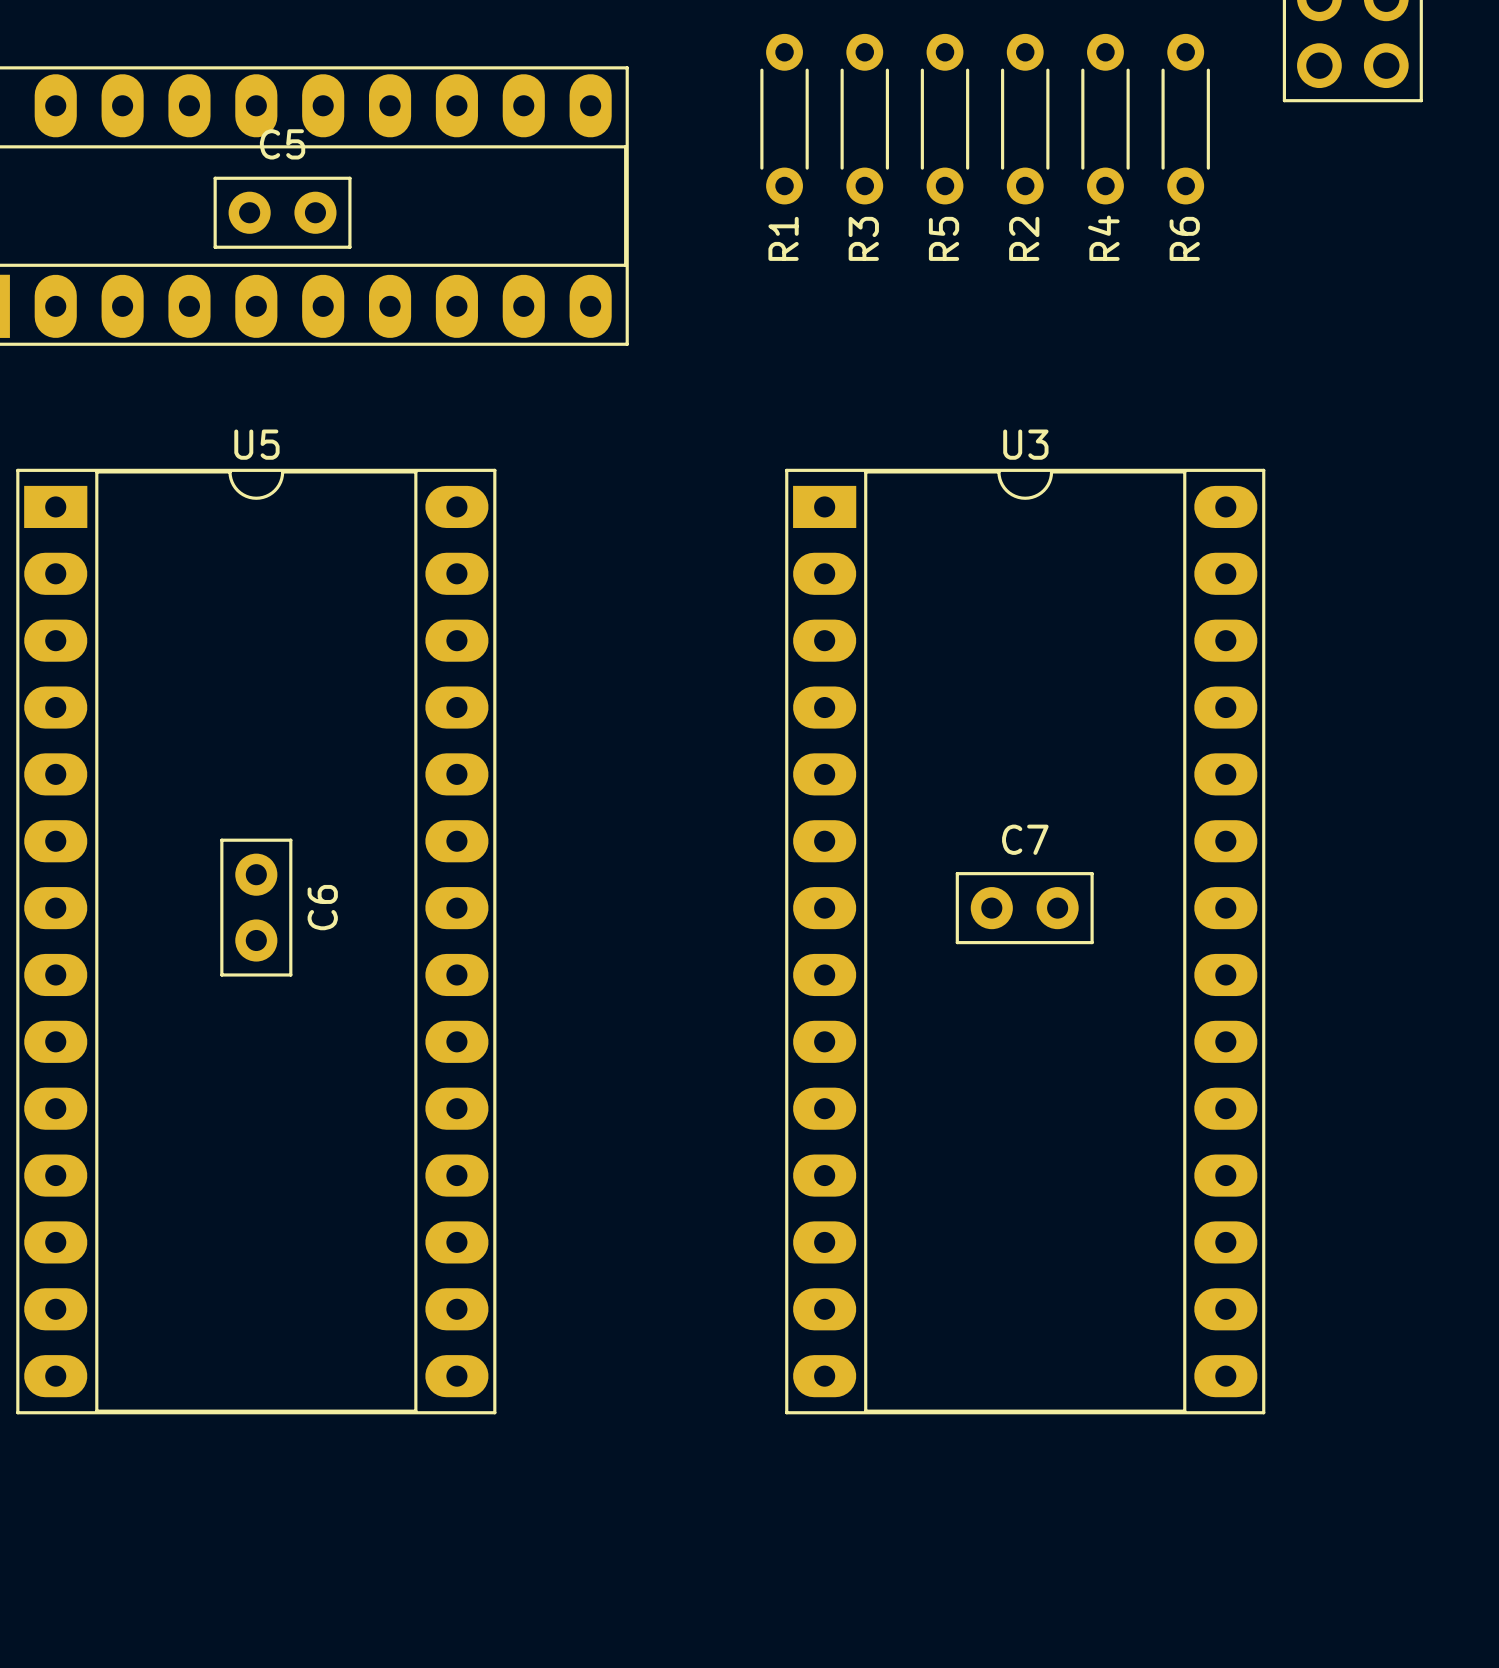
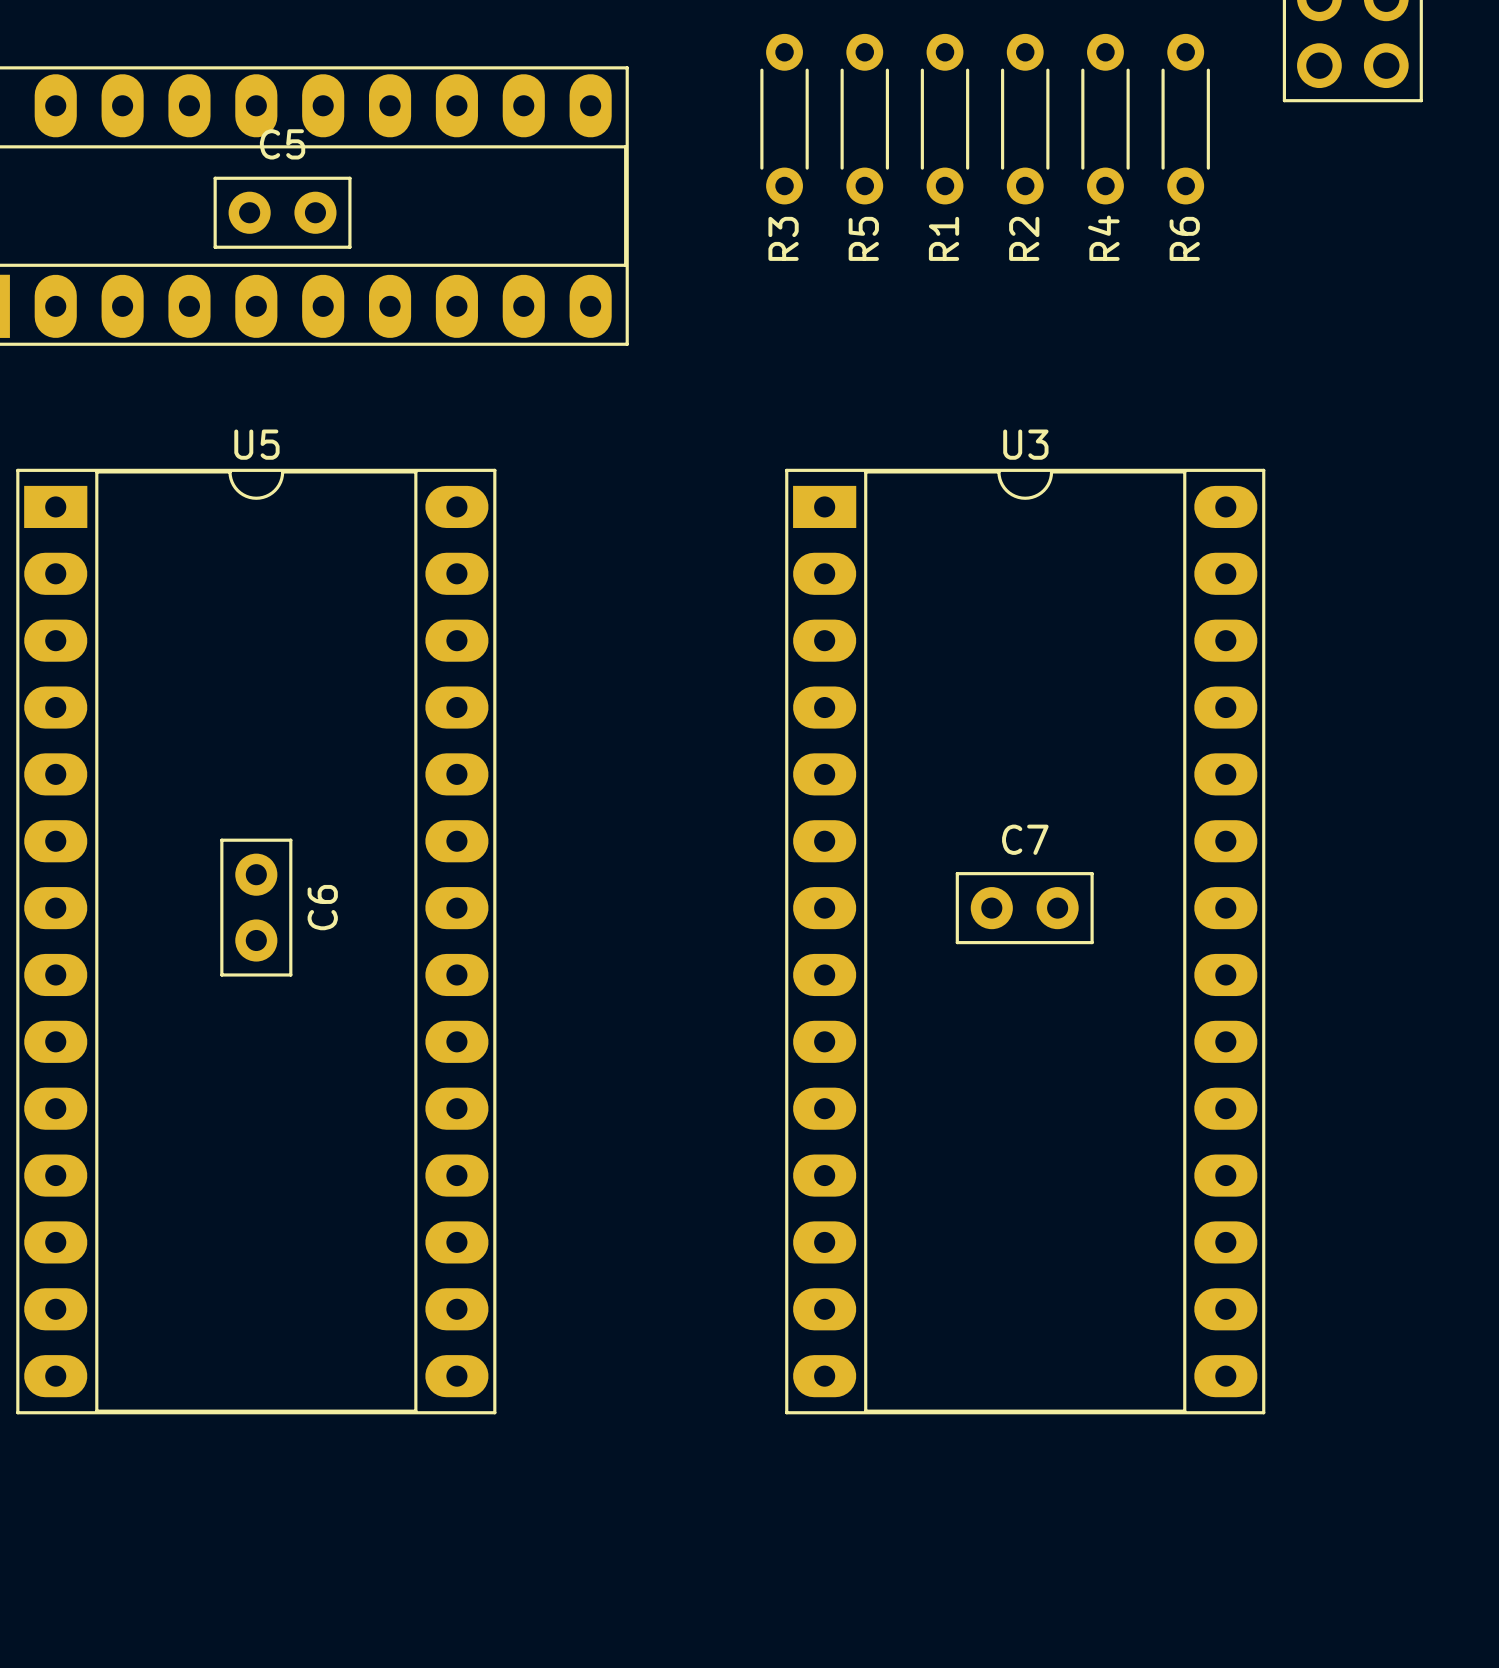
R1 name: R1 (783, 238) -> R3 (783, 238)
R3 name: R3 (863, 238) -> R5 (863, 238)
R5 name: R5 (944, 238) -> R1 (944, 238)

